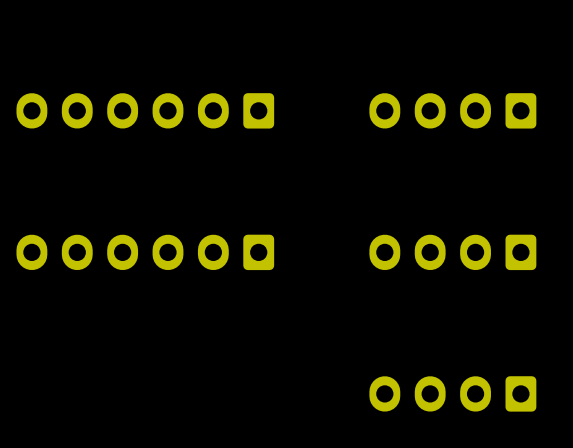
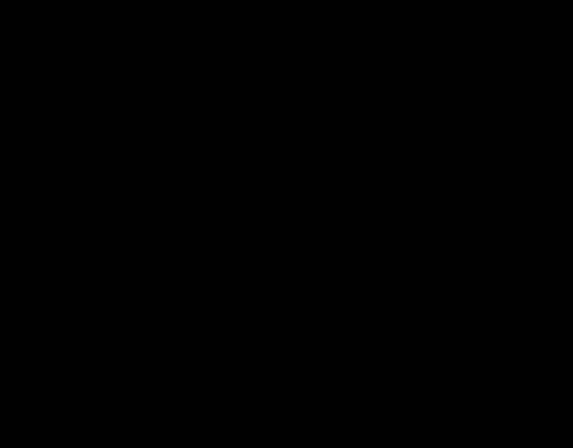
part: (145, 110) -> none
part: (452, 110) -> none
part: (145, 252) -> none
part: (452, 252) -> none
part: (452, 393) -> none

